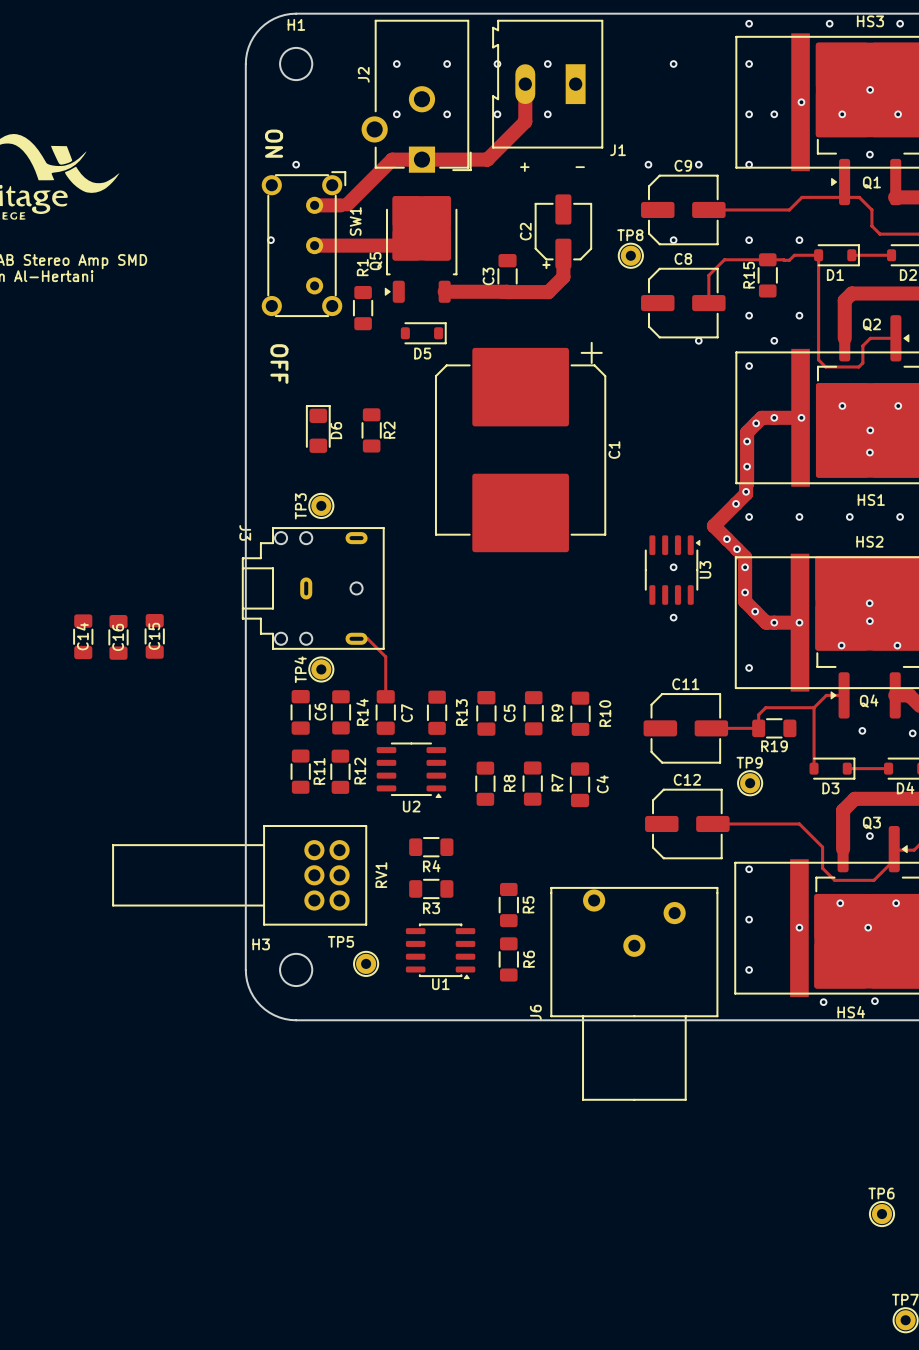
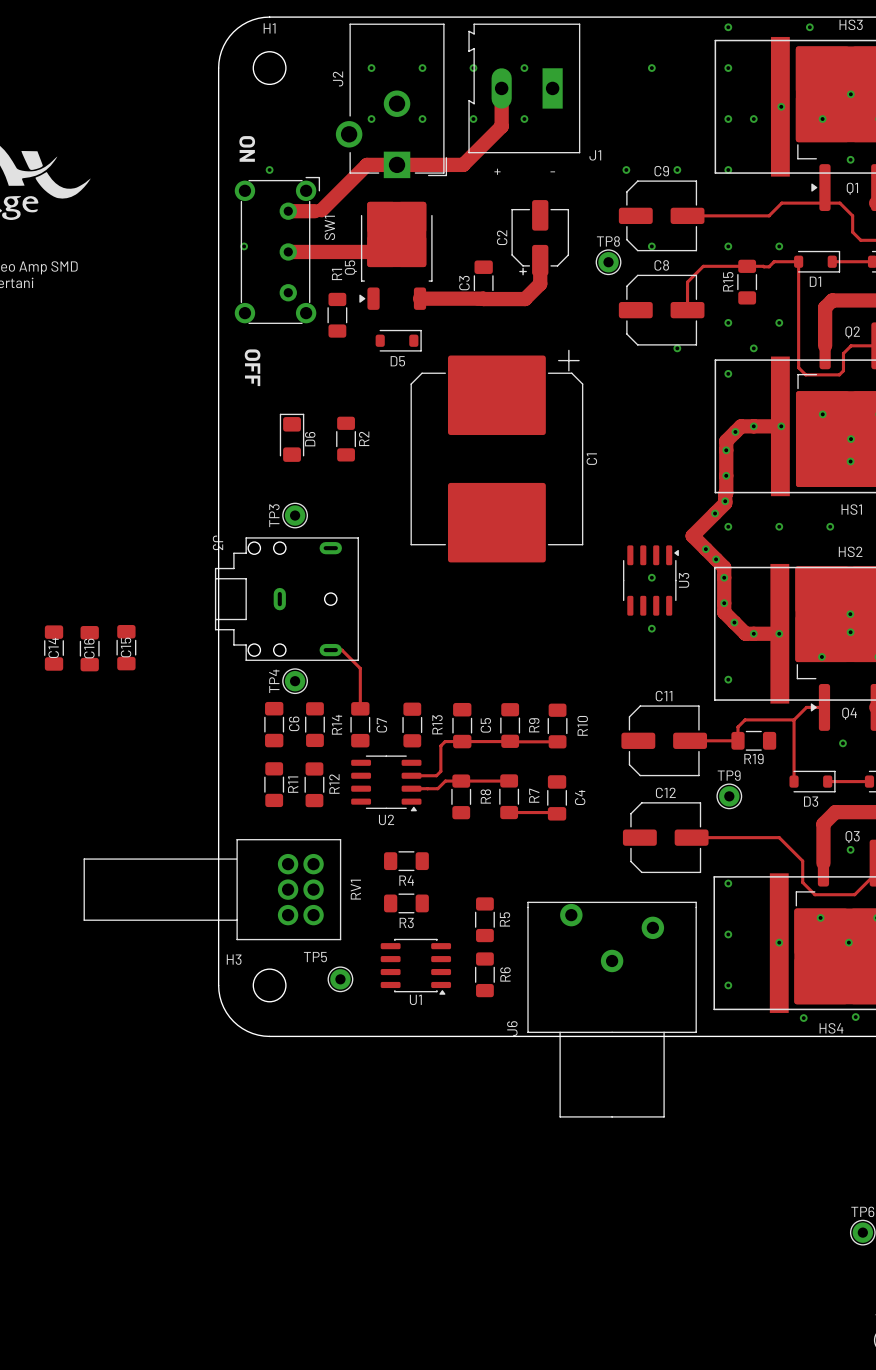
top track: none -> (557, 741) (445, 741) (440, 745) (440, 771) (436, 775) (411, 775)
top track: none -> (509, 781) (445, 781) (437, 788) (411, 788)
top track: none -> (509, 812) (556, 812)

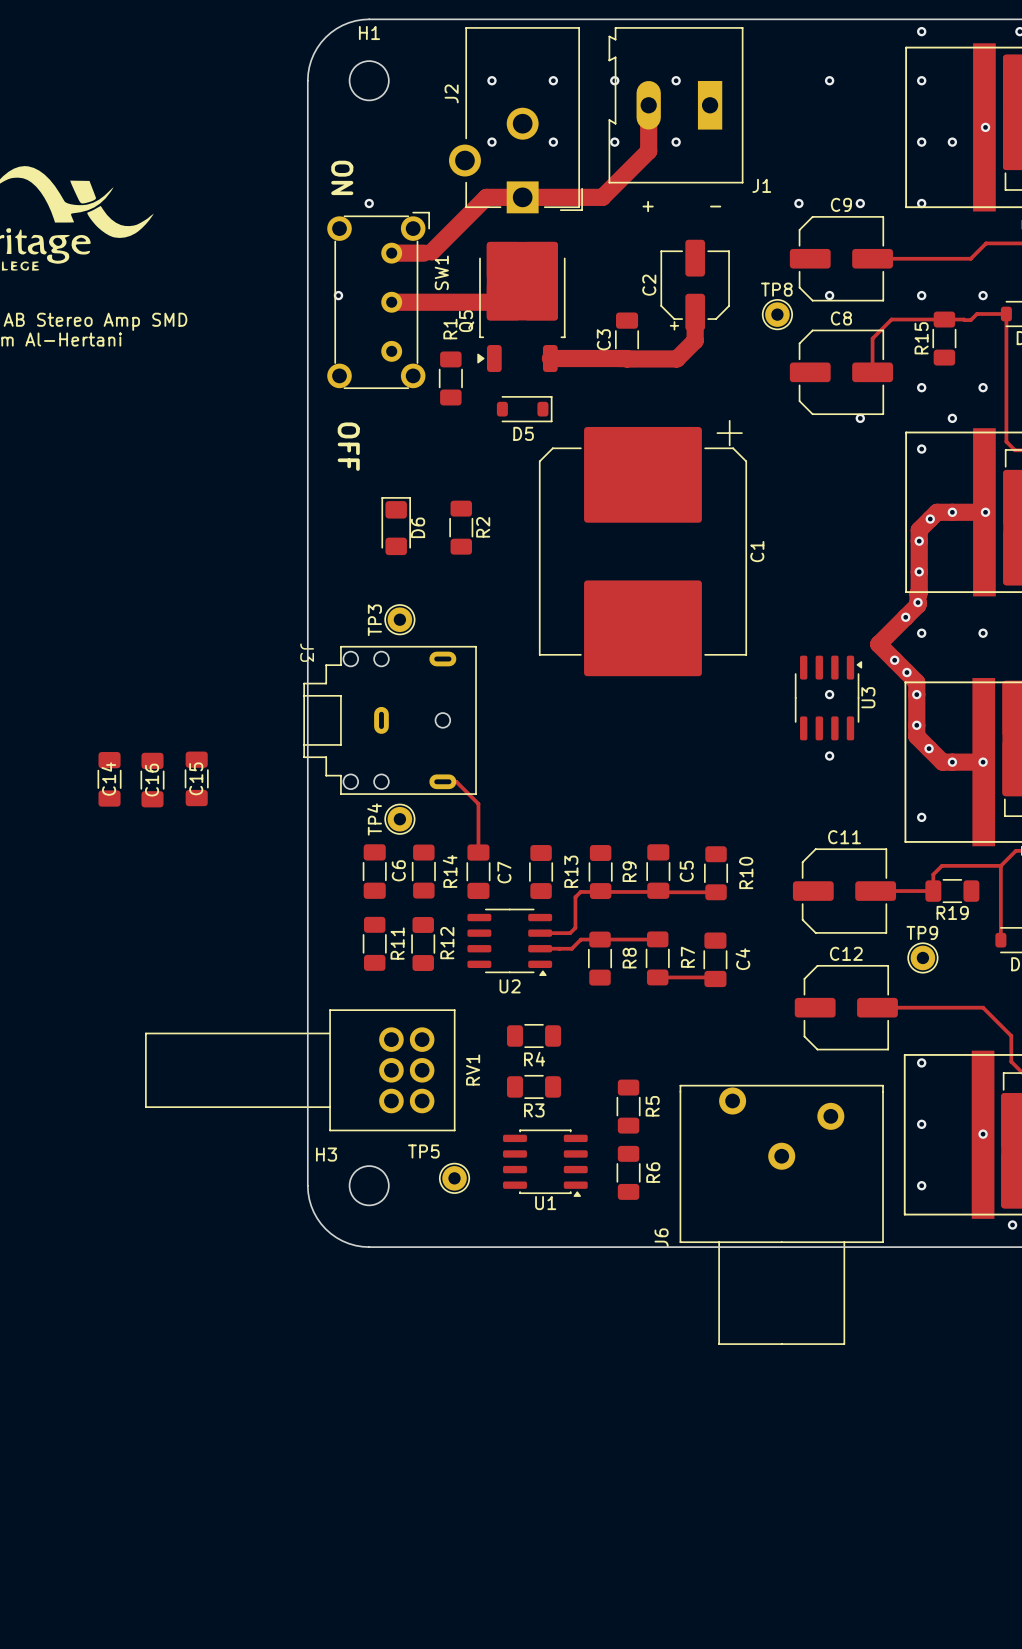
C5 position: (462, 725) -> (658, 871)
R9 position: (510, 725) -> (600, 872)

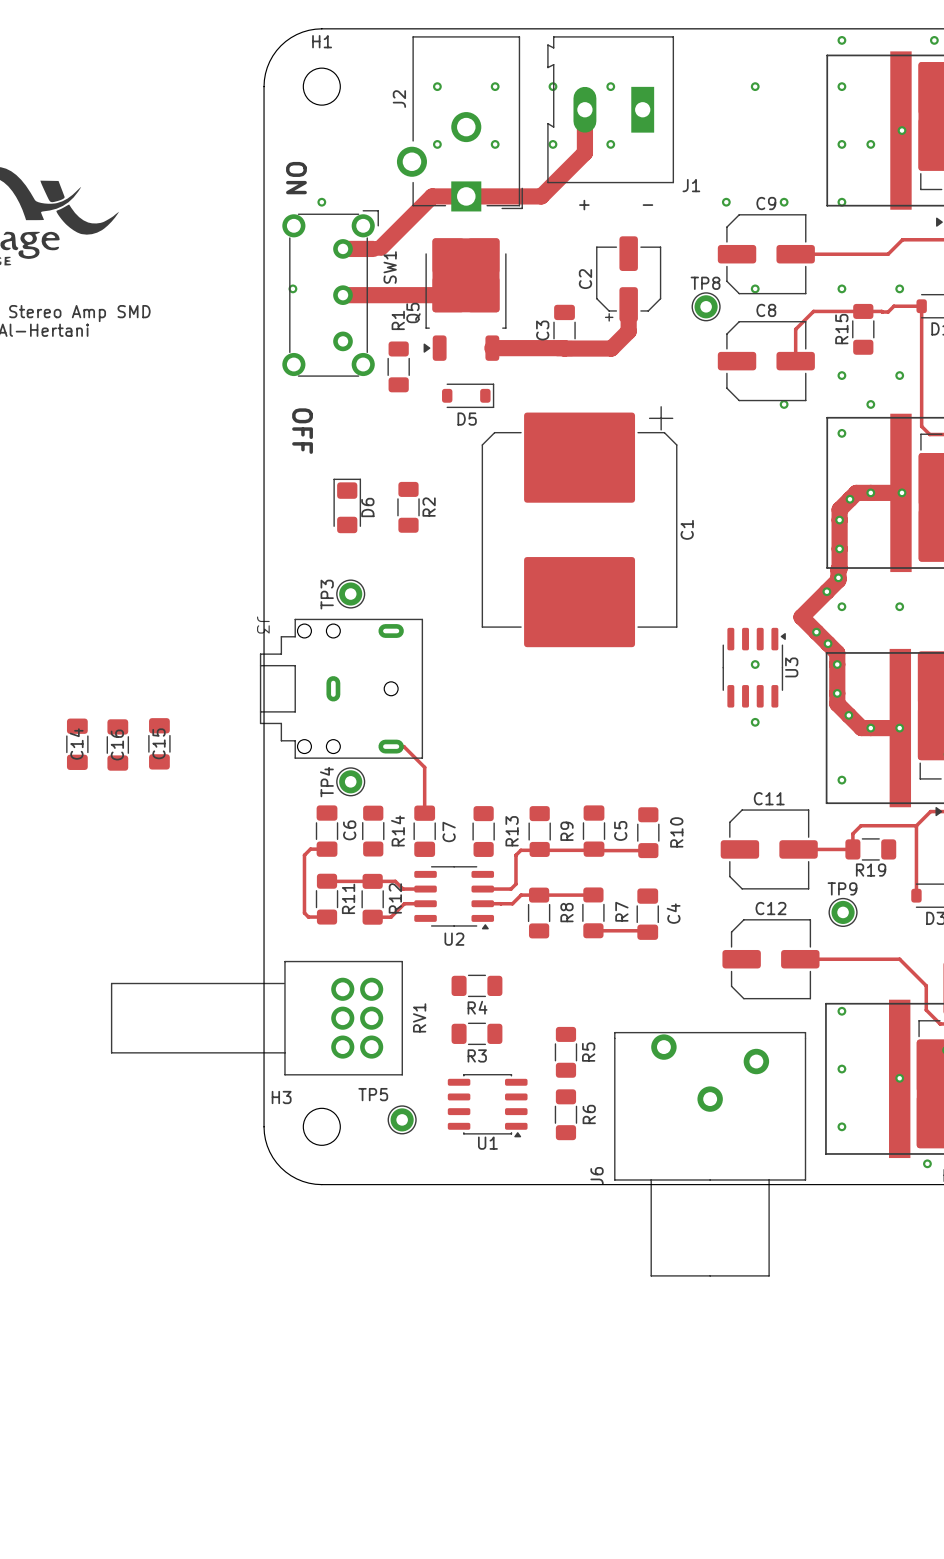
top track: none -> (327, 849) (310, 849) (304, 855) (304, 913) (308, 917) (327, 917)
top track: none -> (330, 881) (395, 881) (403, 889) (425, 889)
top track: none -> (425, 903) (404, 903) (391, 917) (372, 917)

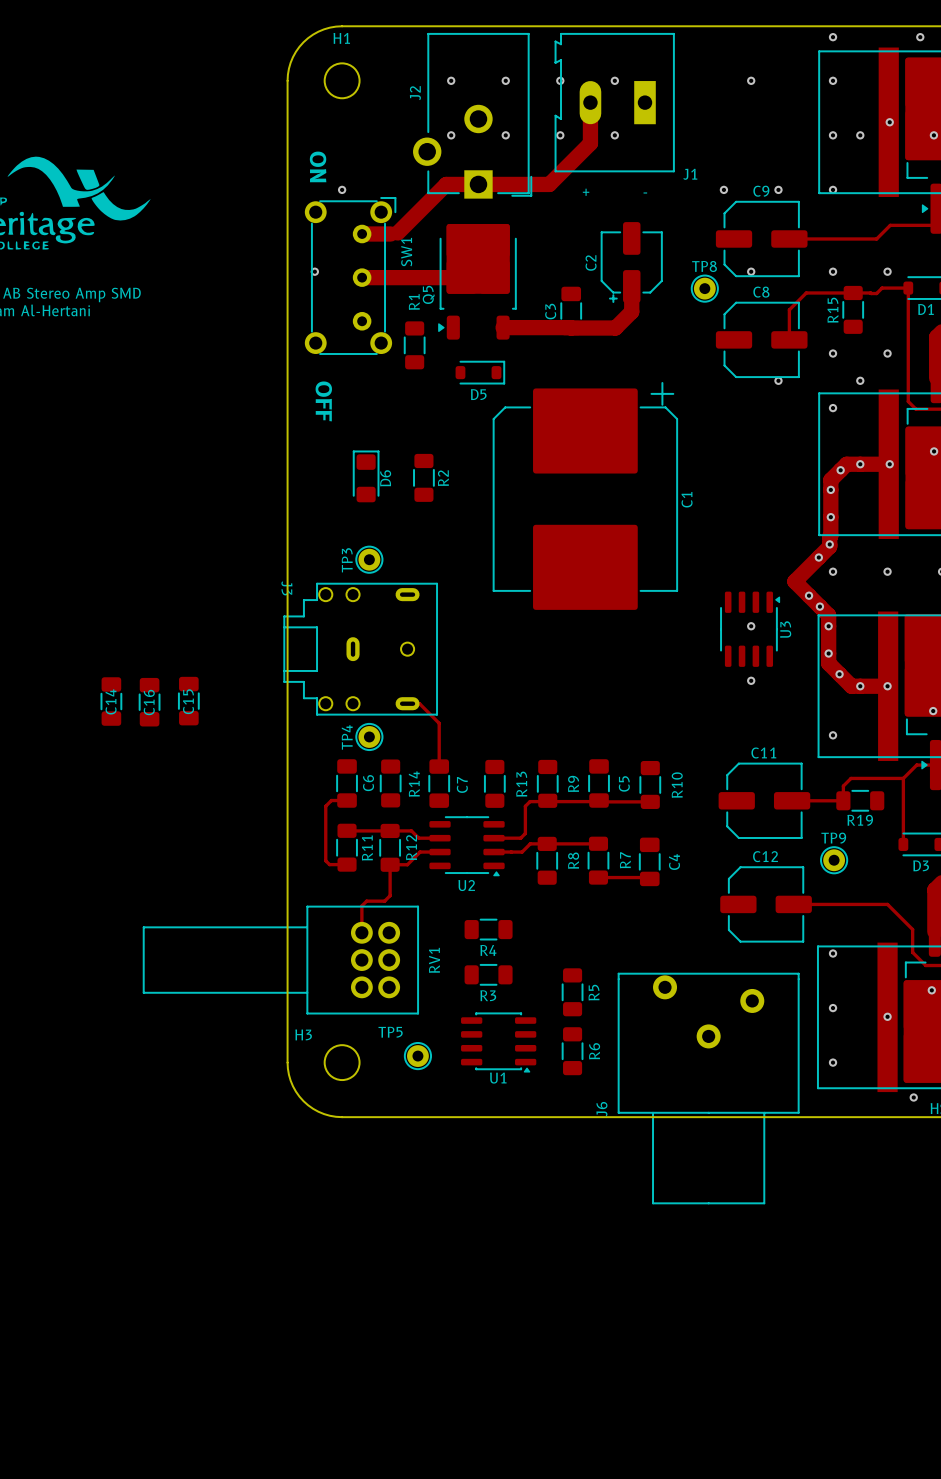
top track: none -> (390, 864) (390, 895) (384, 901) (366, 901) (361, 905) (361, 932)

